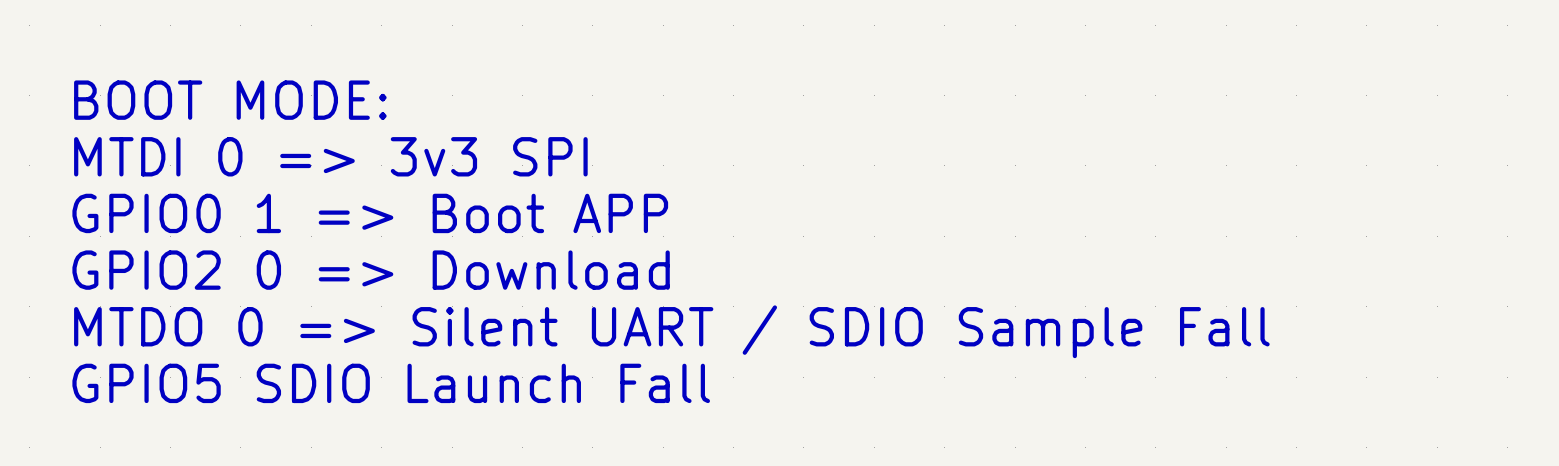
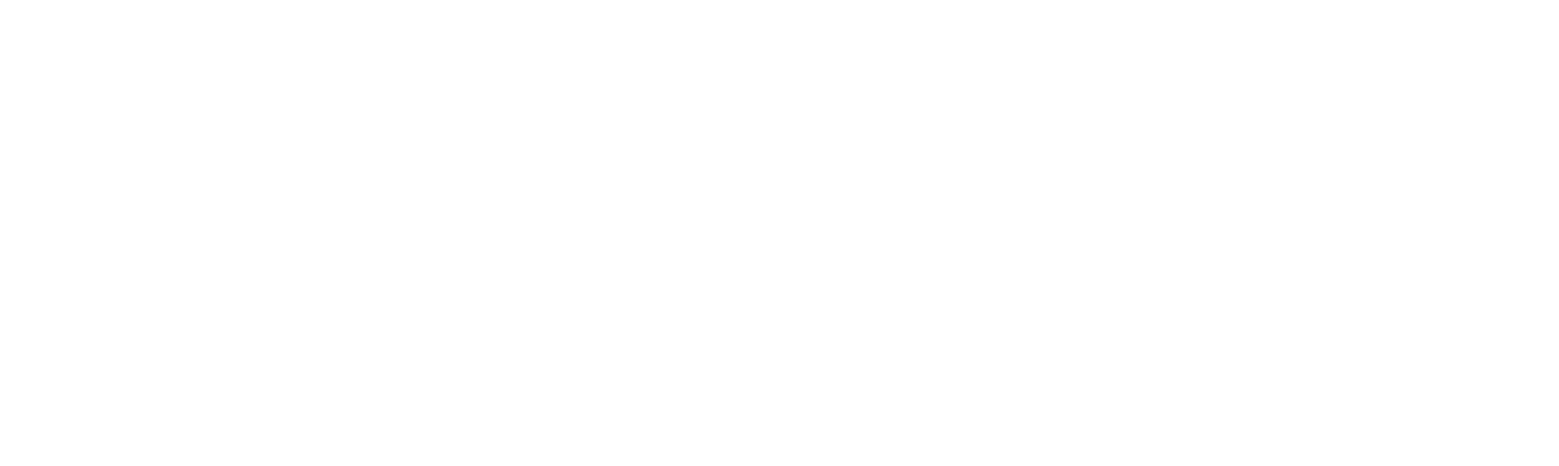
text: BOOT MODE: (230, 100) -> none
text: MTDI 0 => 3v3 SPI (330, 156) -> none
text: GPIO0 1 => Boot APP (370, 213) -> none
text: GPIO2 0 => Download (371, 270) -> none
text: MTDO 0 => Silent UART / SDIO Sample Fall (671, 331) -> none
text: GPIO5 SDIO Launch Fall (391, 383) -> none

